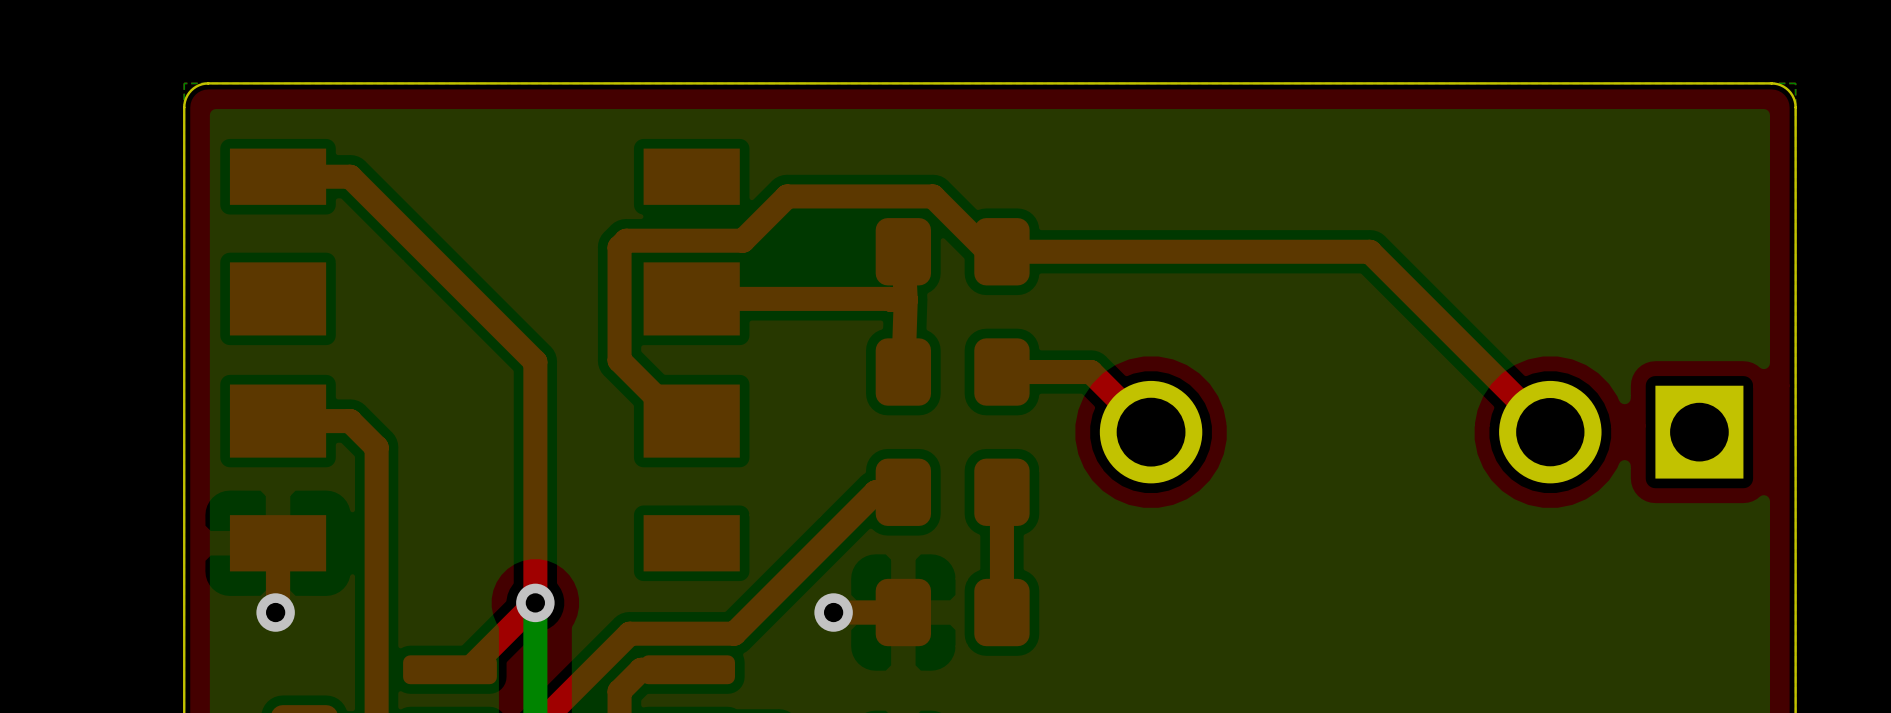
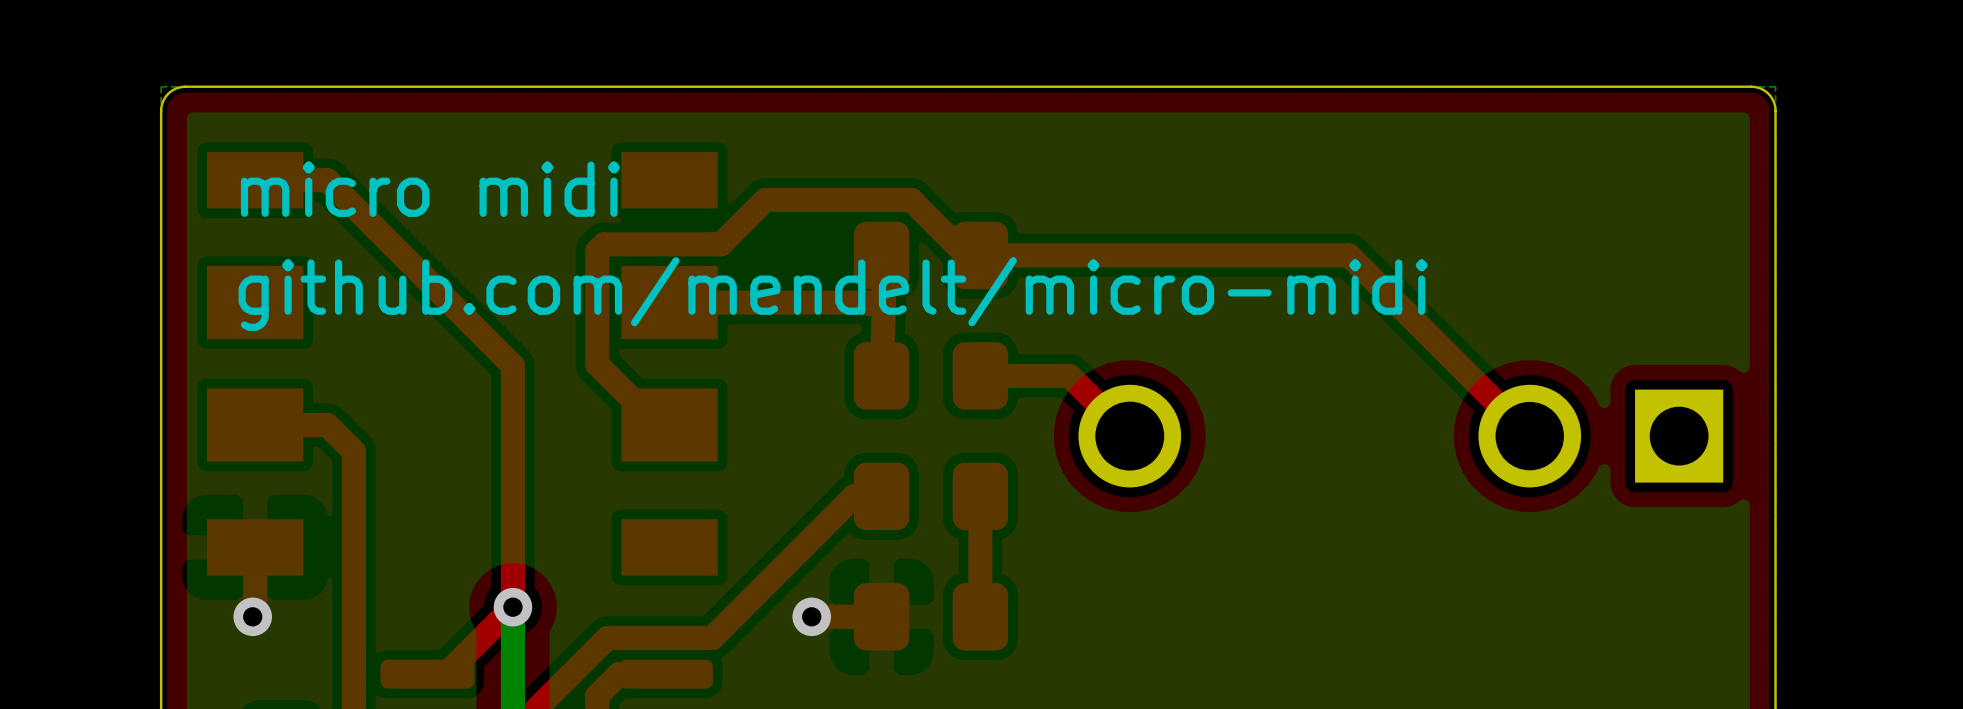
text: none -> micro midi (430, 189)
text: none -> github.com/mendelt/micro-midi (833, 294)

